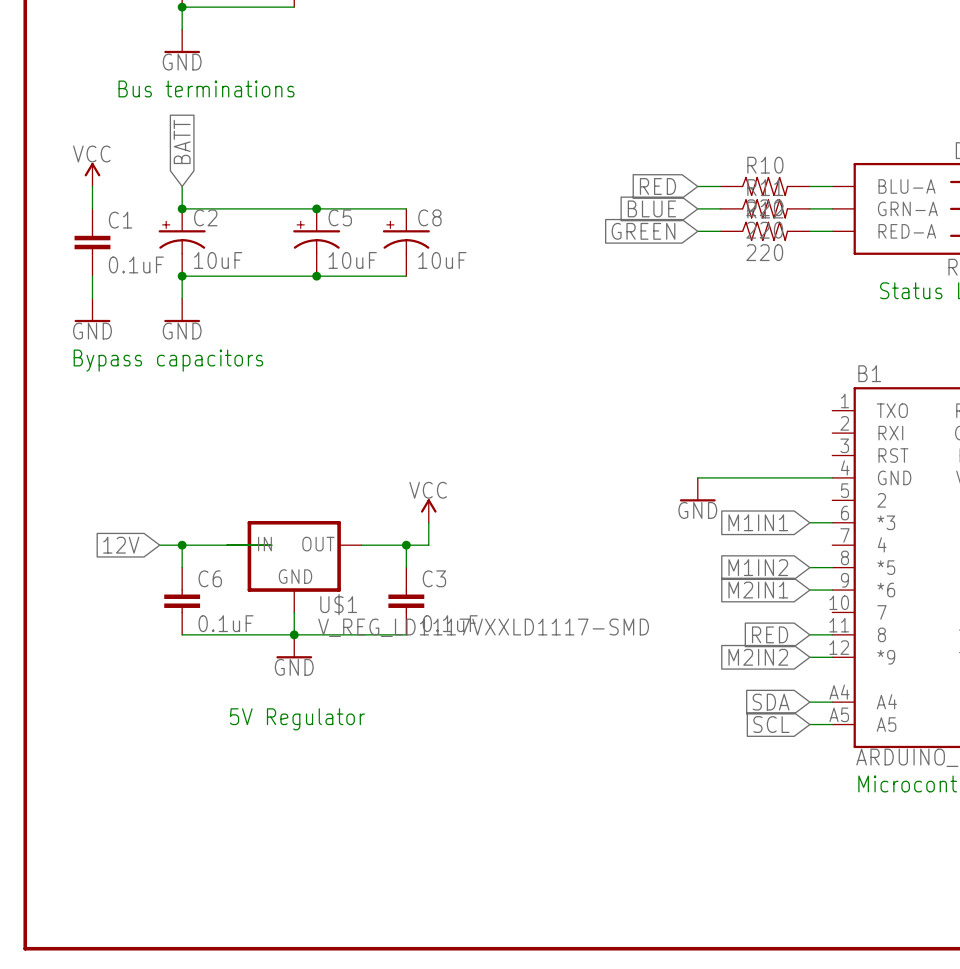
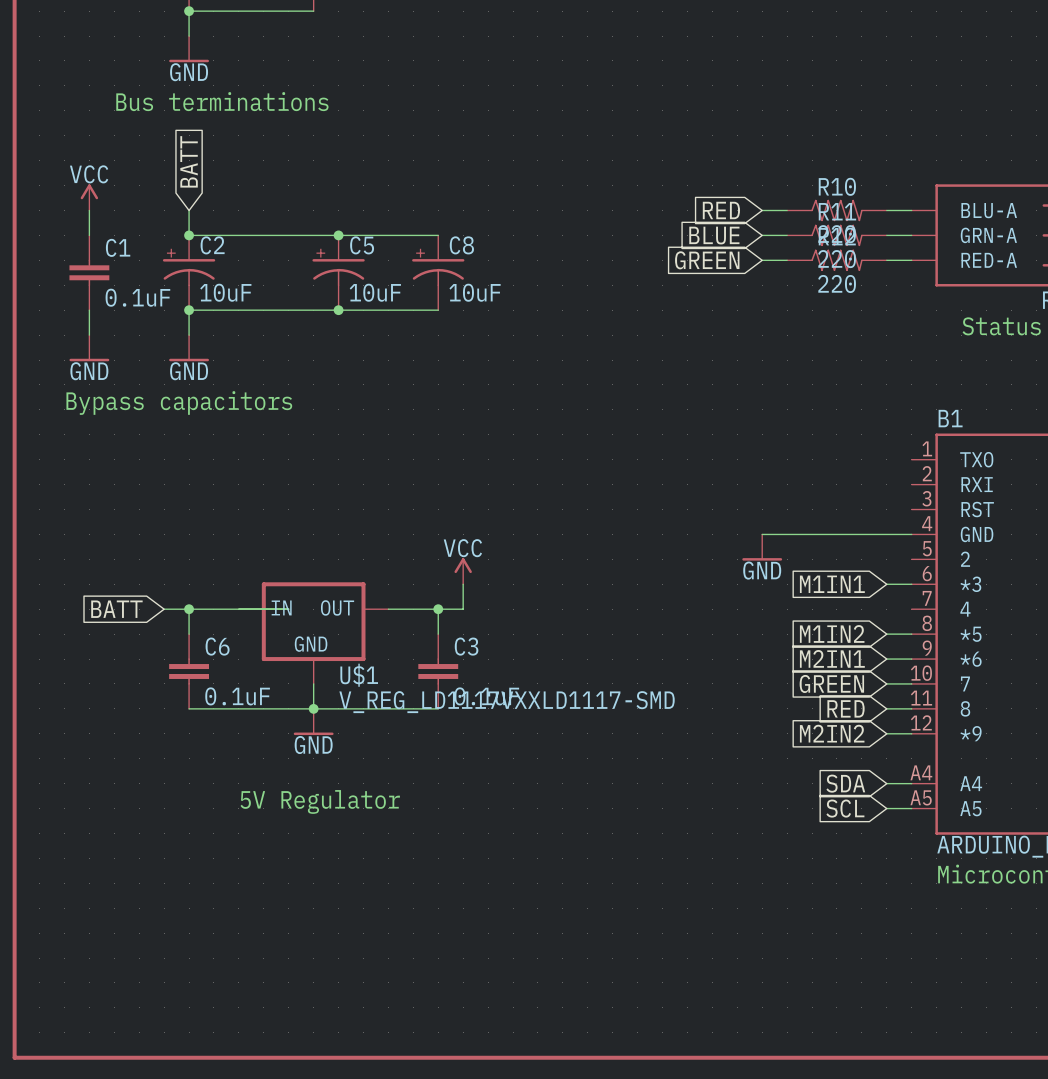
global label: 12V (121, 545) -> BATT (116, 609)
global label: none -> GREEN (831, 683)
wire: none -> (886, 683) (911, 683)

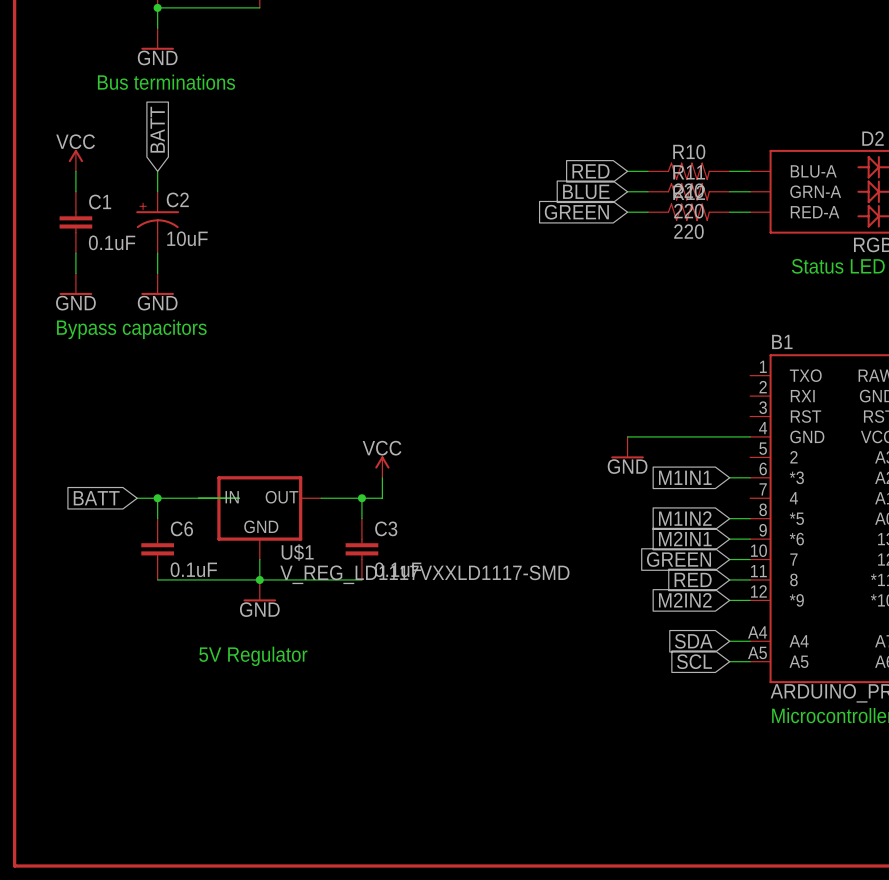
wire: (189, 235) (438, 235) -> none
junction: (189, 235) -> none
junction: (338, 235) -> none
C5: 10uF (338, 272) -> none
C8: 10uF (438, 272) -> none
wire: (189, 310) (438, 310) -> none
junction: (189, 310) -> none
junction: (338, 310) -> none

